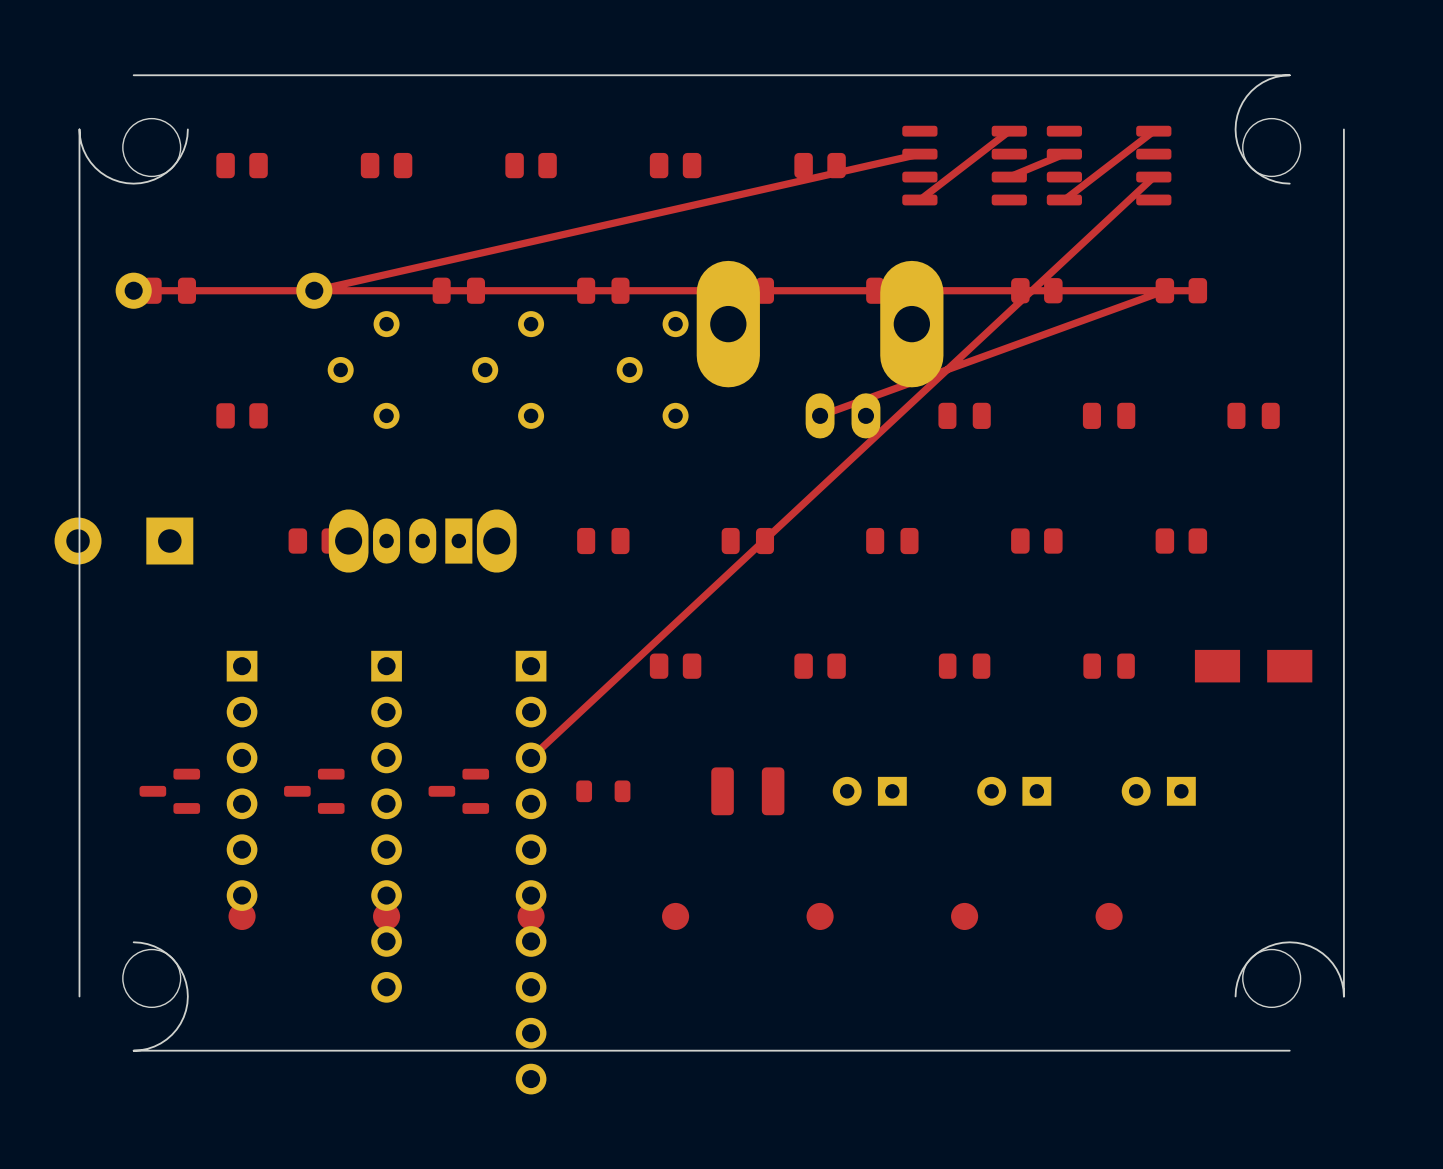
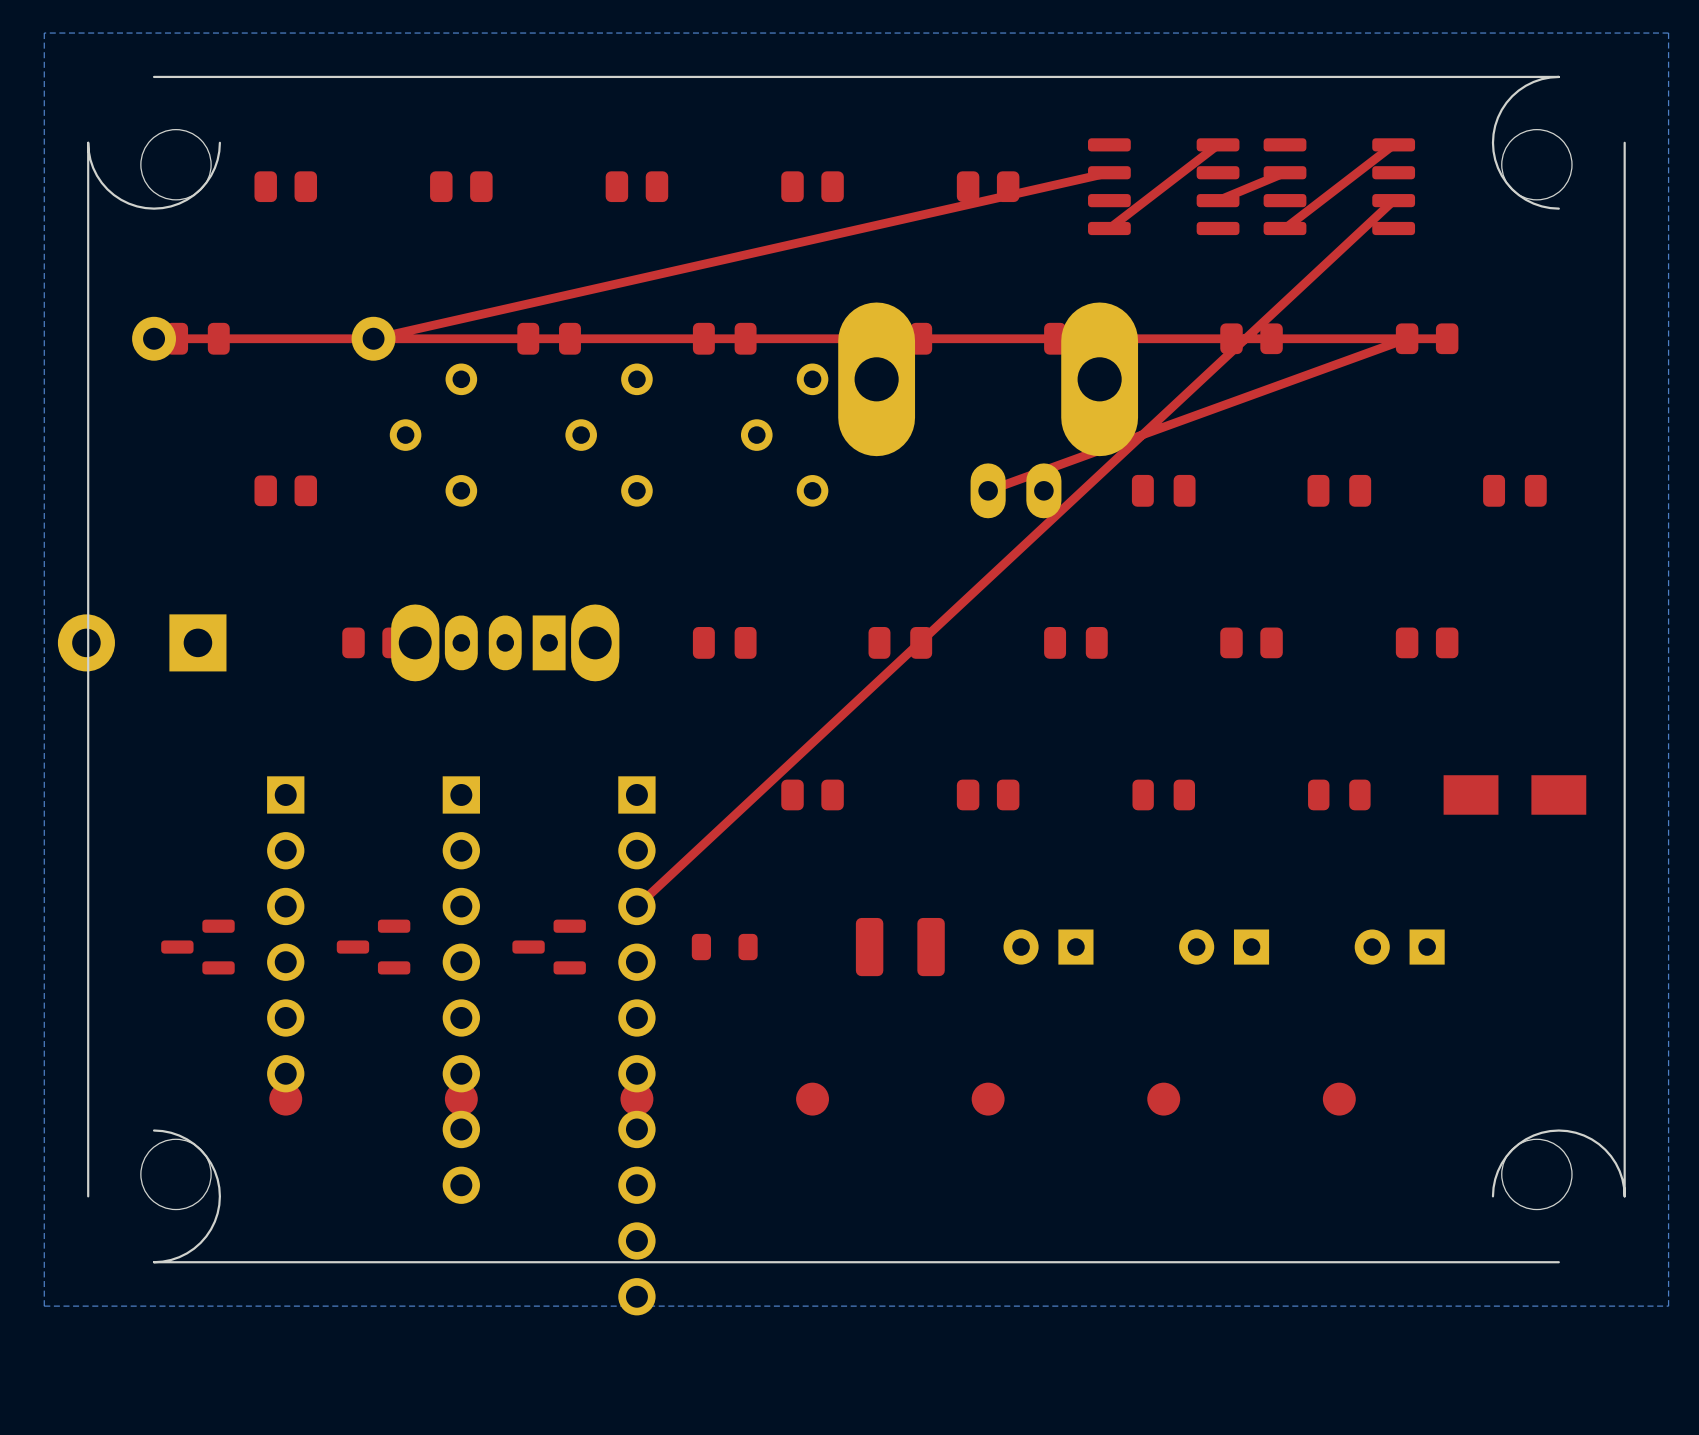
bottom zone outline: none -> (1668, 33) (44, 33) (44, 1306) (1668, 1306) (1668, 33)

